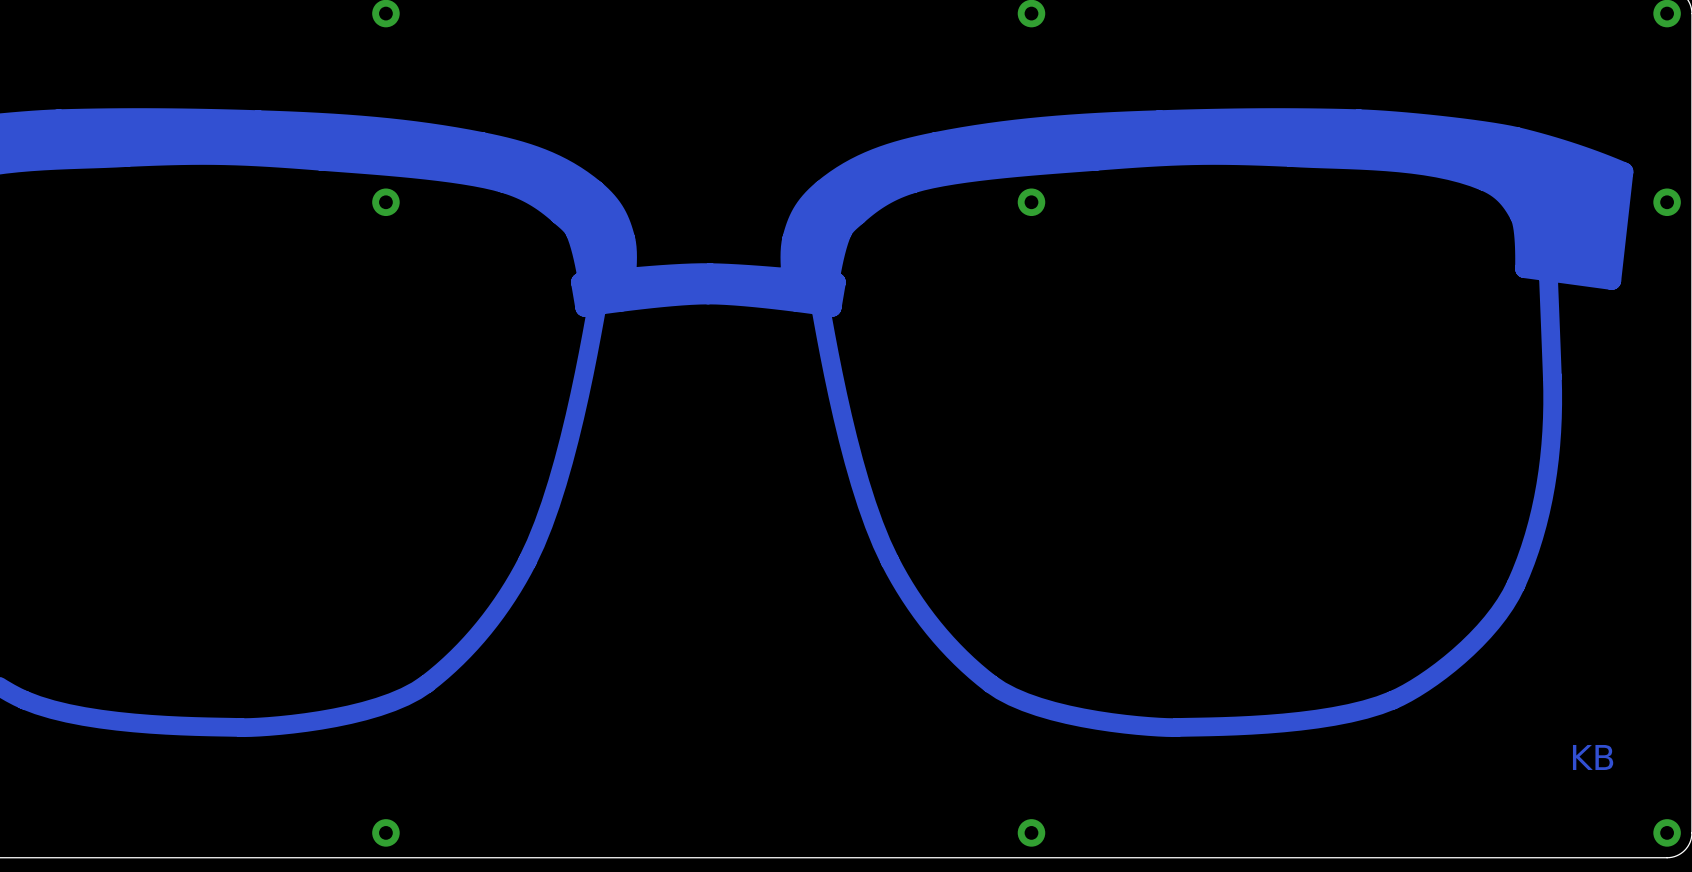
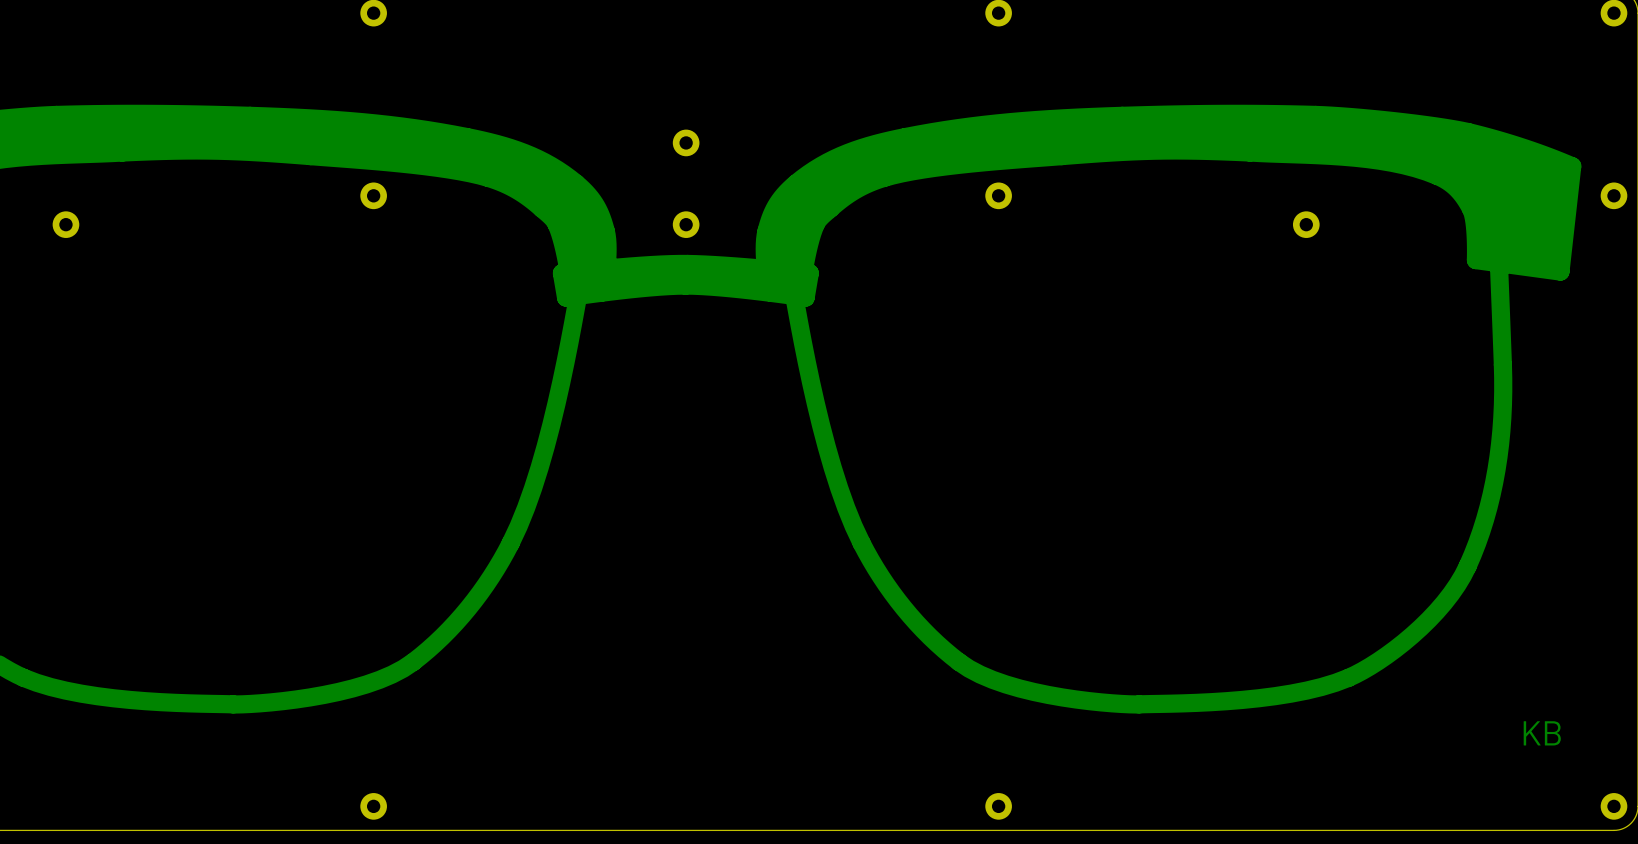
part: none -> (686, 142)
part: none -> (65, 224)
part: none -> (686, 224)
part: none -> (1306, 224)

